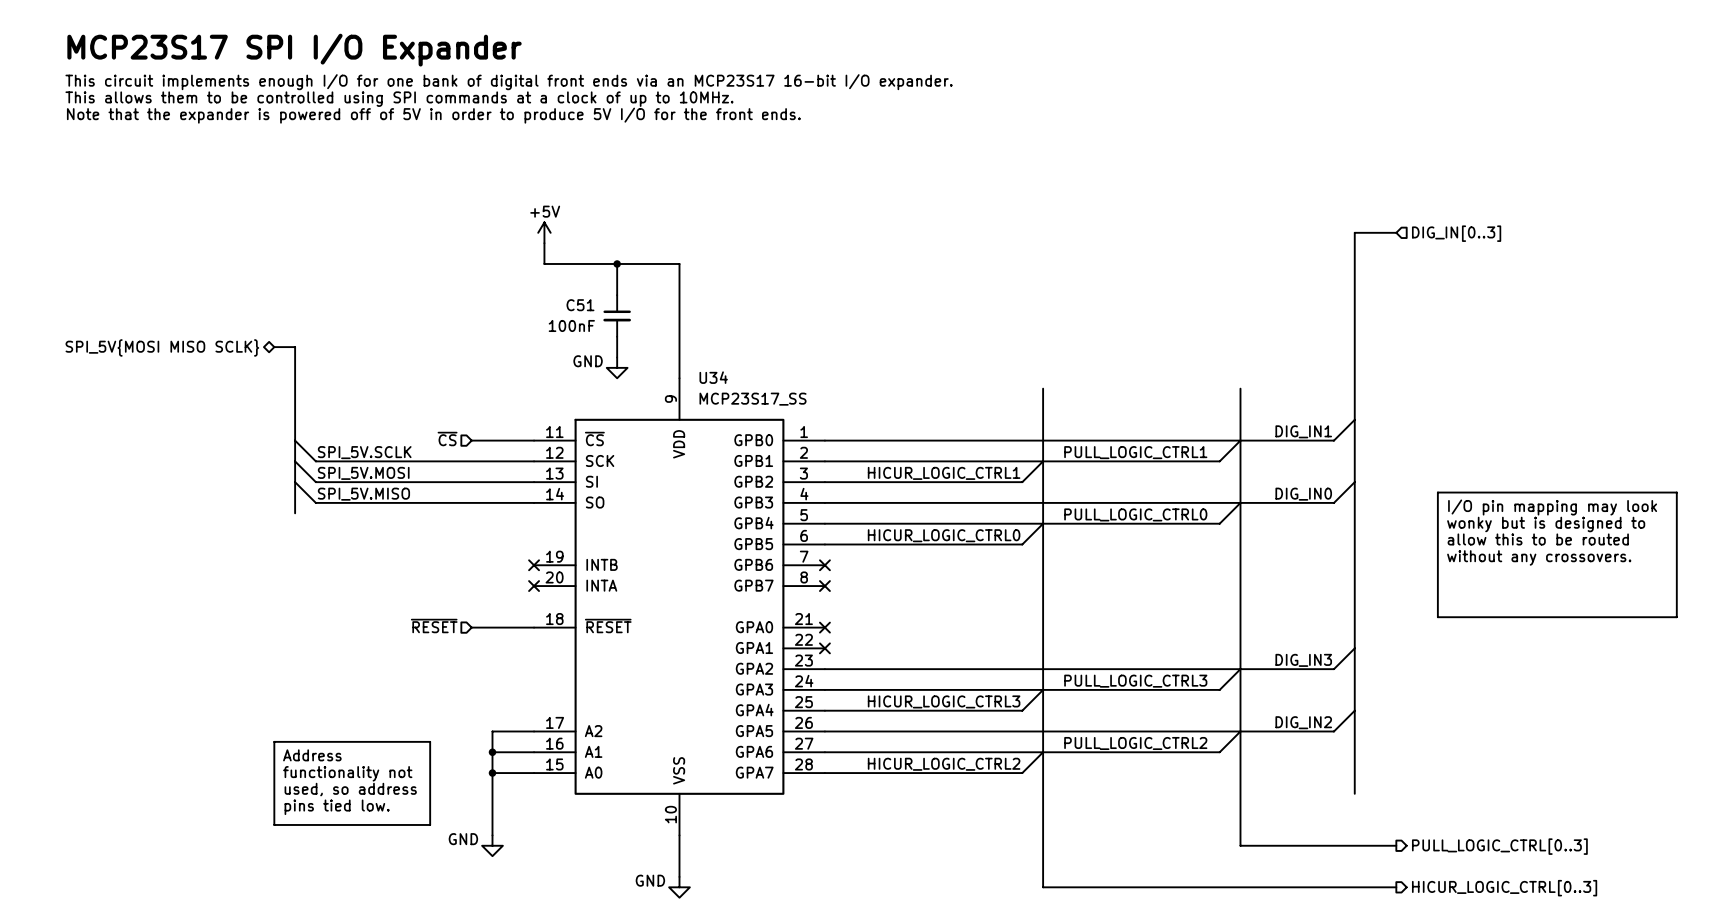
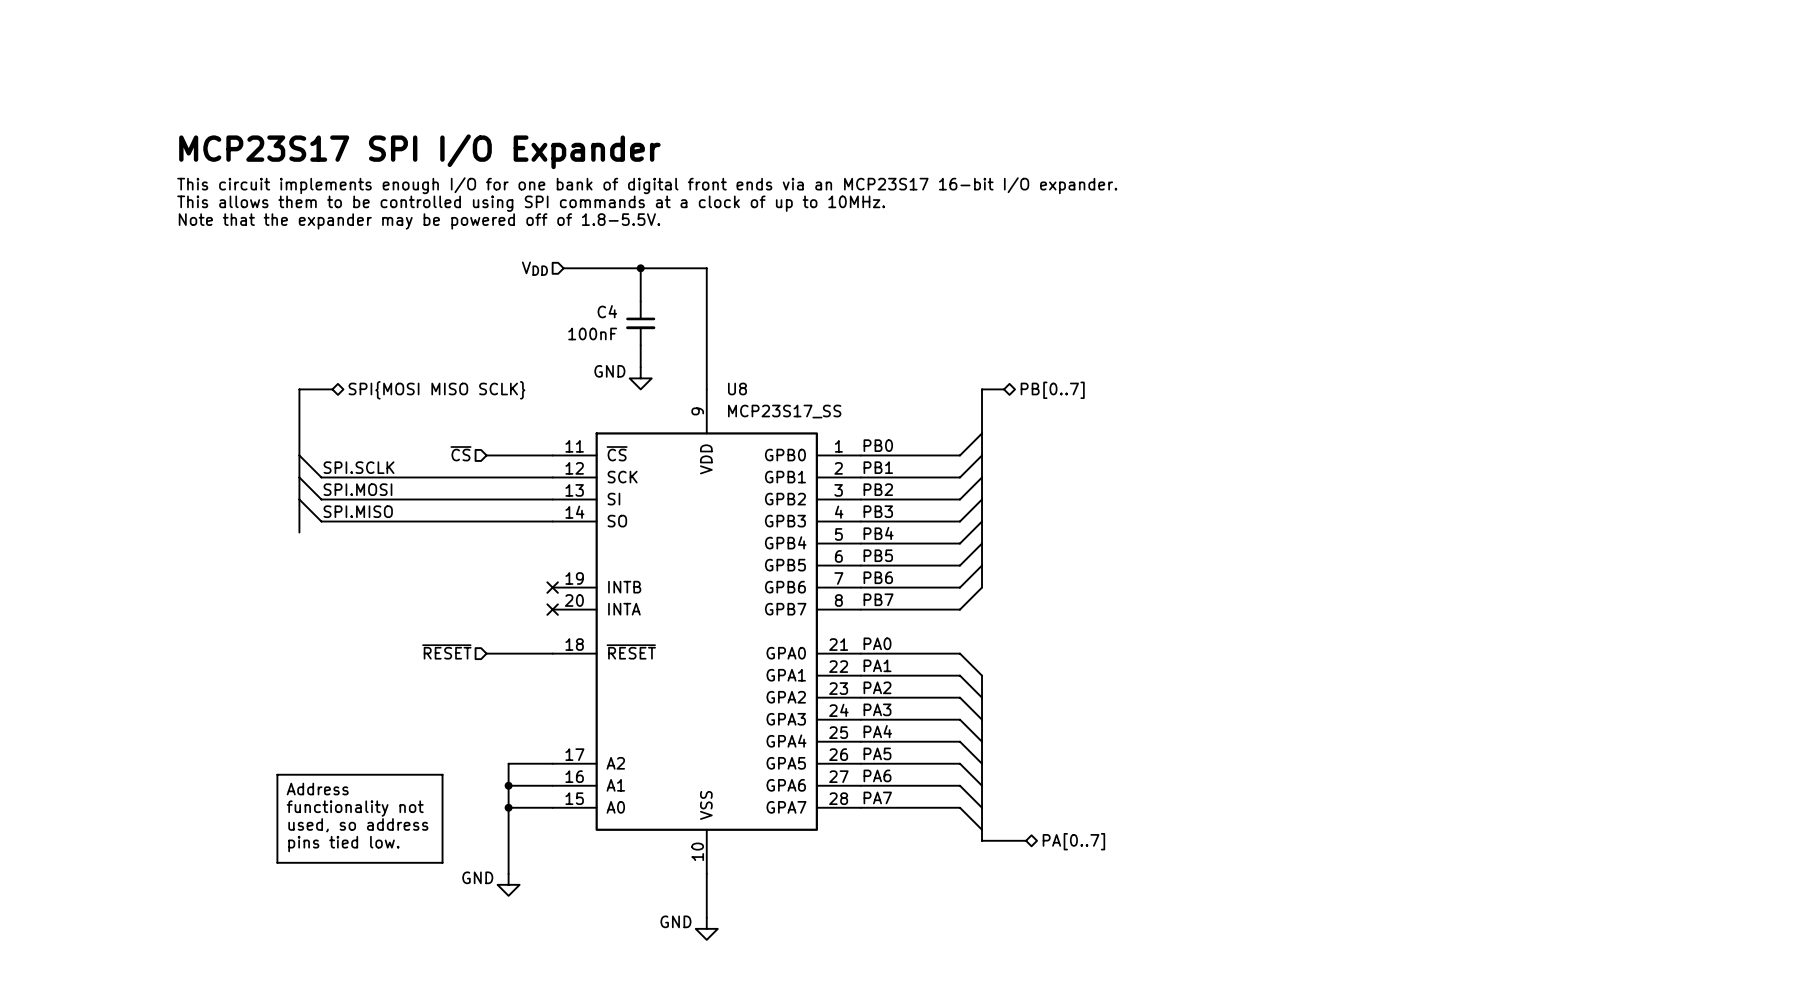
text position: MCP23S17 SPI I/O Expander (294, 50) -> MCP23S17 SPI I/O Expander (419, 151)
text position: This circuit implements enough I/O for one bank of digital front ends via an MCP23S17 16-bit I/O expander. (509, 82) -> This circuit implements enough I/O for one bank of digital front ends via an MCP23S17 16-bit I/O expander. (647, 185)
text position: This allows them to be controlled using SPI commands at a clock of up to 10MHz. (399, 99) -> This allows them to be controlled using SPI commands at a clock of up to 10MHz. (531, 203)
text: Note that the expander is powered off of 5V in order to produce 5V I/O for the front ends. (433, 115) -> none
text: none -> Note that the expander may be powered off of 1.8-5.5V. (419, 221)
power symbol: +5V (544, 232) -> none
bus: (1396, 232) (1354, 232) (1354, 793) -> none
hierarchical label: DIG_IN[0..3] (1456, 233) -> none
wire: (544, 243) (544, 263) -> none
hierarchical label: none -> VDD (534, 268)
C51 name: C51 (580, 305) -> C4 (607, 311)
hierarchical label: SPI_5V{MOSI MISO SCLK} (162, 347) -> none
bus: (274, 347) (295, 347) (295, 378) -> (332, 389) (299, 389)
U34 name: U34 (713, 377) -> U8 (737, 388)
bus: none -> (1004, 389) (982, 389) (982, 587)
hierarchical label: none -> SPI{MOSI MISO SCLK} (436, 390)
hierarchical label: none -> PB[0..7] (1052, 390)
bus: (1043, 388) (1043, 887) (1396, 887) -> none
bus: (1240, 388) (1240, 845) (1396, 845) -> none
wire: (1354, 419) (1333, 440) (918, 440) -> (982, 433) (959, 455)
label: none -> PB0 (878, 445)
label: DIG_IN1 (1303, 431) -> none
wire: (1240, 440) (1219, 461) (918, 461) -> (982, 455) (959, 477)
label: SPI_5V.SCLK (364, 452) -> SPI.SCLK (359, 467)
label: none -> PB1 (878, 467)
label: PULL_LOGIC_CTRL1 (1135, 452) -> none
wire: (1043, 461) (1022, 482) (918, 482) -> (982, 477) (959, 499)
label: none -> PB2 (878, 489)
label: SPI_5V.MOSI (363, 473) -> SPI.MOSI (357, 489)
label: HICUR_LOGIC_CTRL1 (944, 473) -> none
wire: (1354, 482) (1333, 502) (918, 502) -> (982, 499) (959, 521)
line: (1437, 492) (1676, 492) (1676, 617) (1437, 617) (1437, 492) -> none
label: none -> PB3 (878, 511)
label: SPI_5V.MISO (363, 494) -> SPI.MISO (358, 511)
label: DIG_IN0 (1303, 494) -> none
wire: (1240, 502) (1219, 523) (918, 523) -> (982, 521) (959, 543)
text: I/O pin mapping may look (1552, 507) -> none
label: none -> PB4 (878, 533)
label: PULL_LOGIC_CTRL0 (1135, 514) -> none
wire: (1043, 523) (1022, 544) (918, 544) -> (982, 543) (959, 565)
text: wonky but is designed to (1546, 524) -> none
label: none -> PB5 (878, 555)
label: HICUR_LOGIC_CTRL0 (944, 535) -> none
text: allow this to be routed (1538, 539) -> none
wire: none -> (982, 565) (959, 587) (860, 587)
label: none -> PB6 (878, 577)
text: without any crossovers. (1539, 557) -> none
no-connect mark: (824, 565) -> none
wire: none -> (982, 587) (959, 609) (860, 609)
label: none -> PB7 (878, 599)
no-connect mark: (824, 586) -> none
label: none -> PA0 (877, 643)
wire: none -> (860, 653) (959, 653) (982, 675)
no-connect mark: (824, 627) -> none
label: none -> PA1 (877, 665)
wire: none -> (860, 675) (959, 675) (982, 697)
no-connect mark: (824, 648) -> none
bus: none -> (982, 675) (982, 840) (1026, 840)
wire: (1354, 648) (1333, 669) (918, 669) -> (982, 719) (959, 697)
label: none -> PA2 (877, 687)
label: DIG_IN3 (1303, 660) -> none
wire: (1240, 669) (1219, 689) (918, 689) -> (982, 741) (959, 719)
label: none -> PA3 (877, 709)
label: PULL_LOGIC_CTRL3 (1135, 681) -> none
wire: (1043, 689) (1022, 710) (918, 710) -> (982, 763) (959, 741)
label: none -> PA4 (877, 731)
label: HICUR_LOGIC_CTRL3 (944, 701) -> none
wire: (1354, 710) (1333, 731) (918, 731) -> (982, 785) (959, 763)
label: none -> PA5 (877, 753)
label: DIG_IN2 (1303, 722) -> none
wire: (1240, 731) (1219, 752) (918, 752) -> (982, 807) (959, 785)
label: none -> PA6 (877, 775)
label: PULL_LOGIC_CTRL2 (1135, 743) -> none
wire: (1043, 752) (1022, 773) (918, 773) -> (982, 829) (959, 807)
label: none -> PA7 (877, 797)
label: HICUR_LOGIC_CTRL2 (944, 764) -> none
hierarchical label: none -> PA[0..7] (1073, 841)
hierarchical label: PULL_LOGIC_CTRL[0..3] (1499, 846) -> none
hierarchical label: HICUR_LOGIC_CTRL[0..3] (1504, 888) -> none

